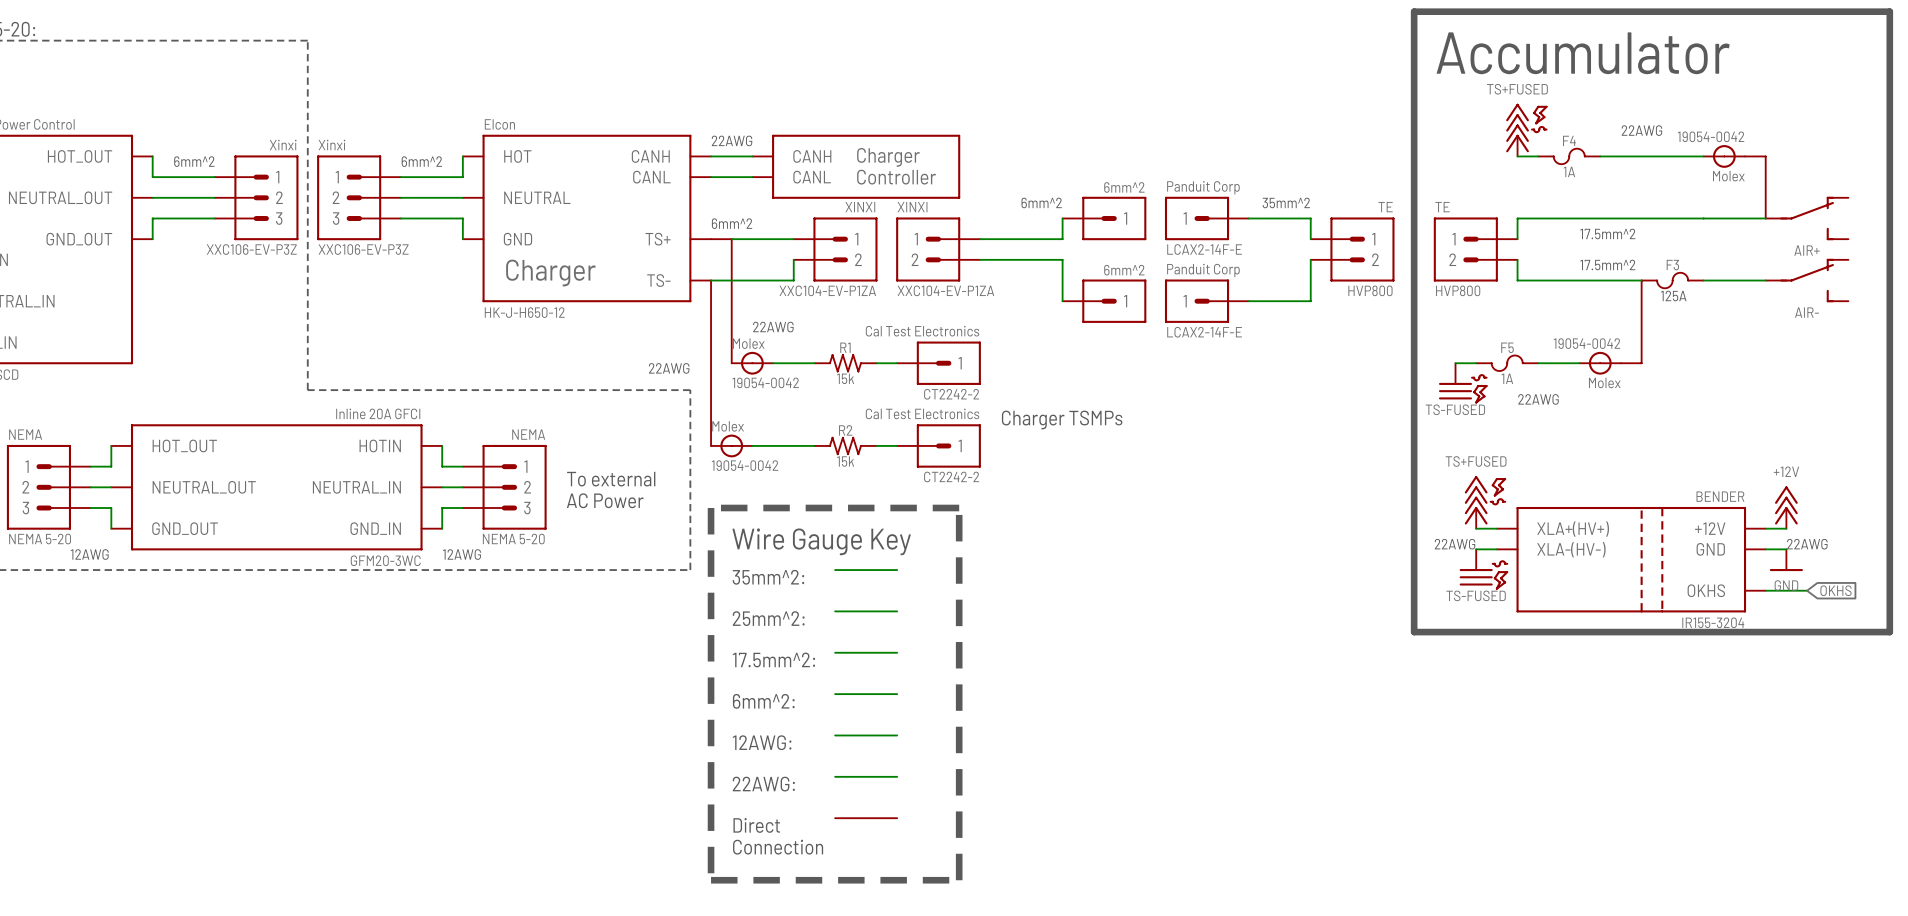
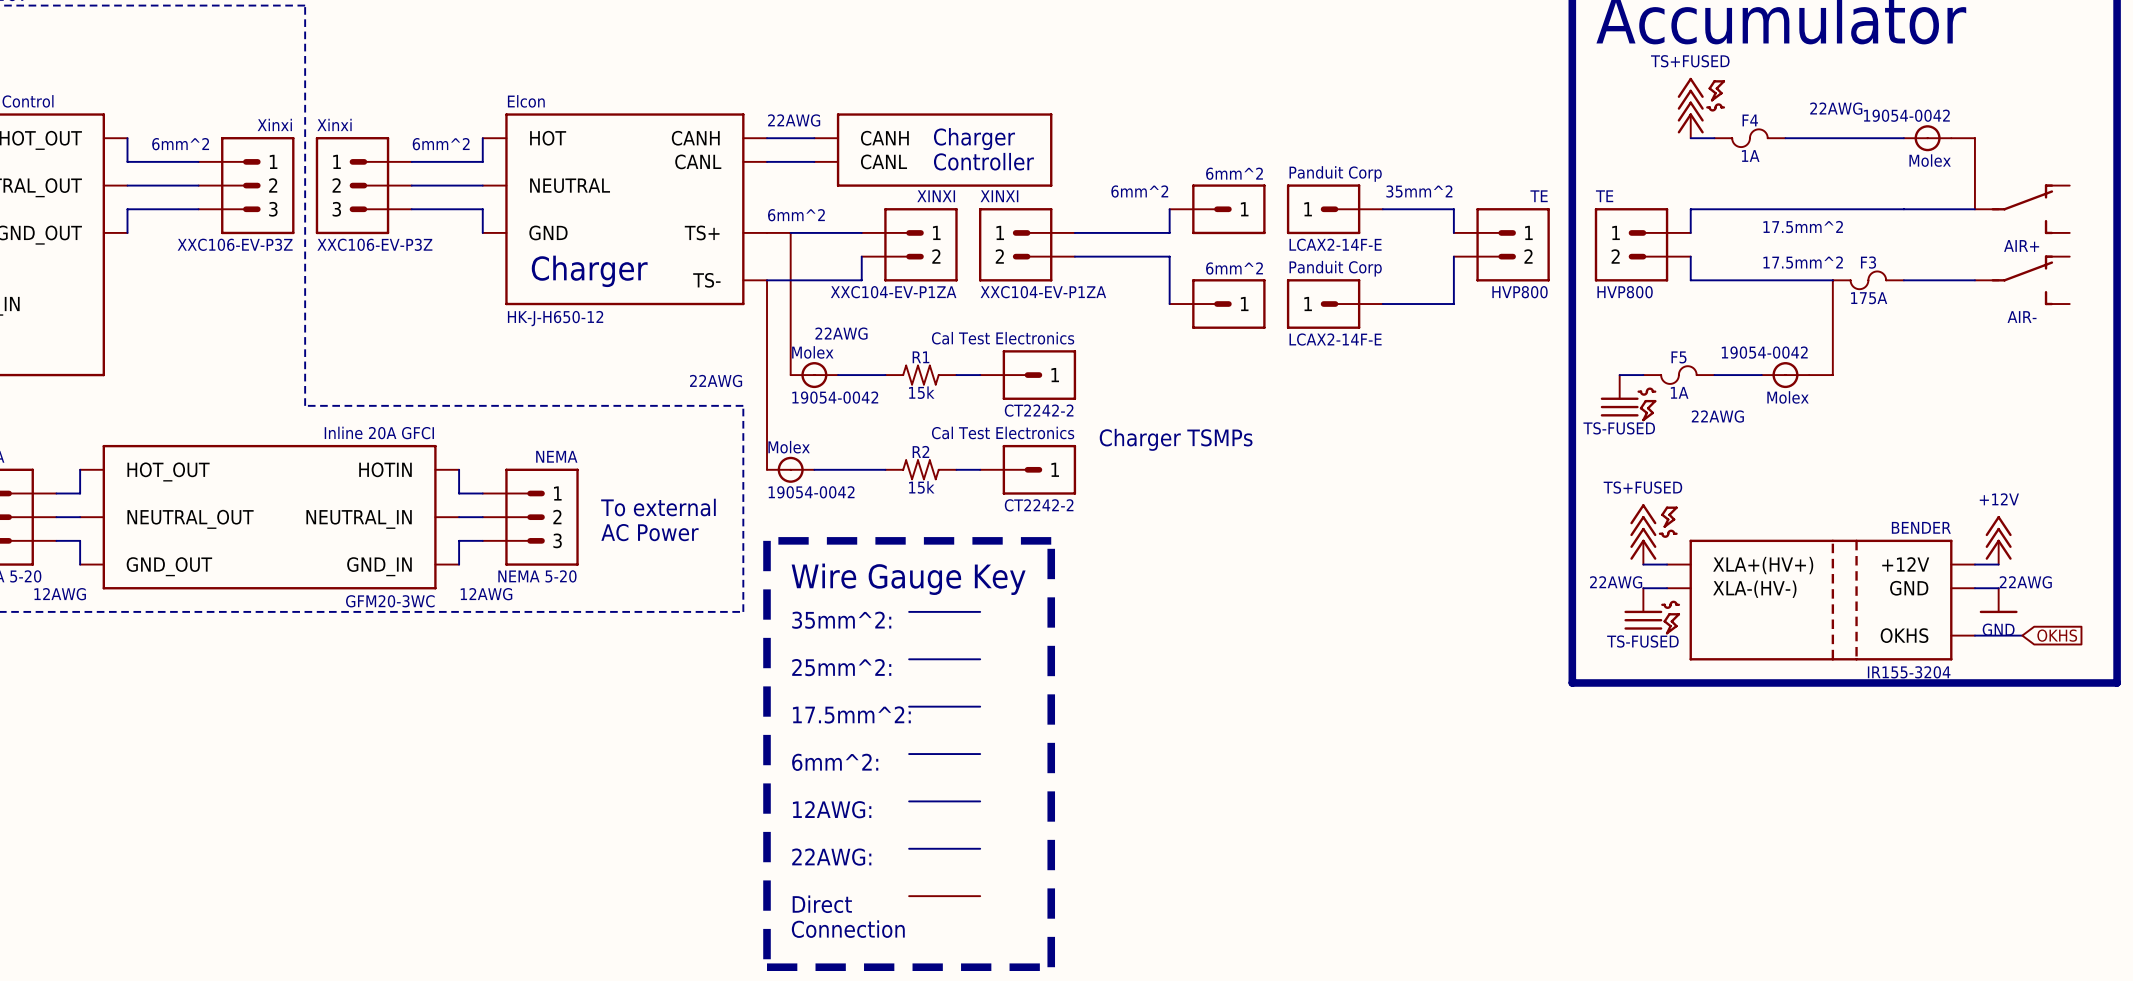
F3 value: none -> 175A (1869, 298)
text: 125A (1673, 296) -> none

